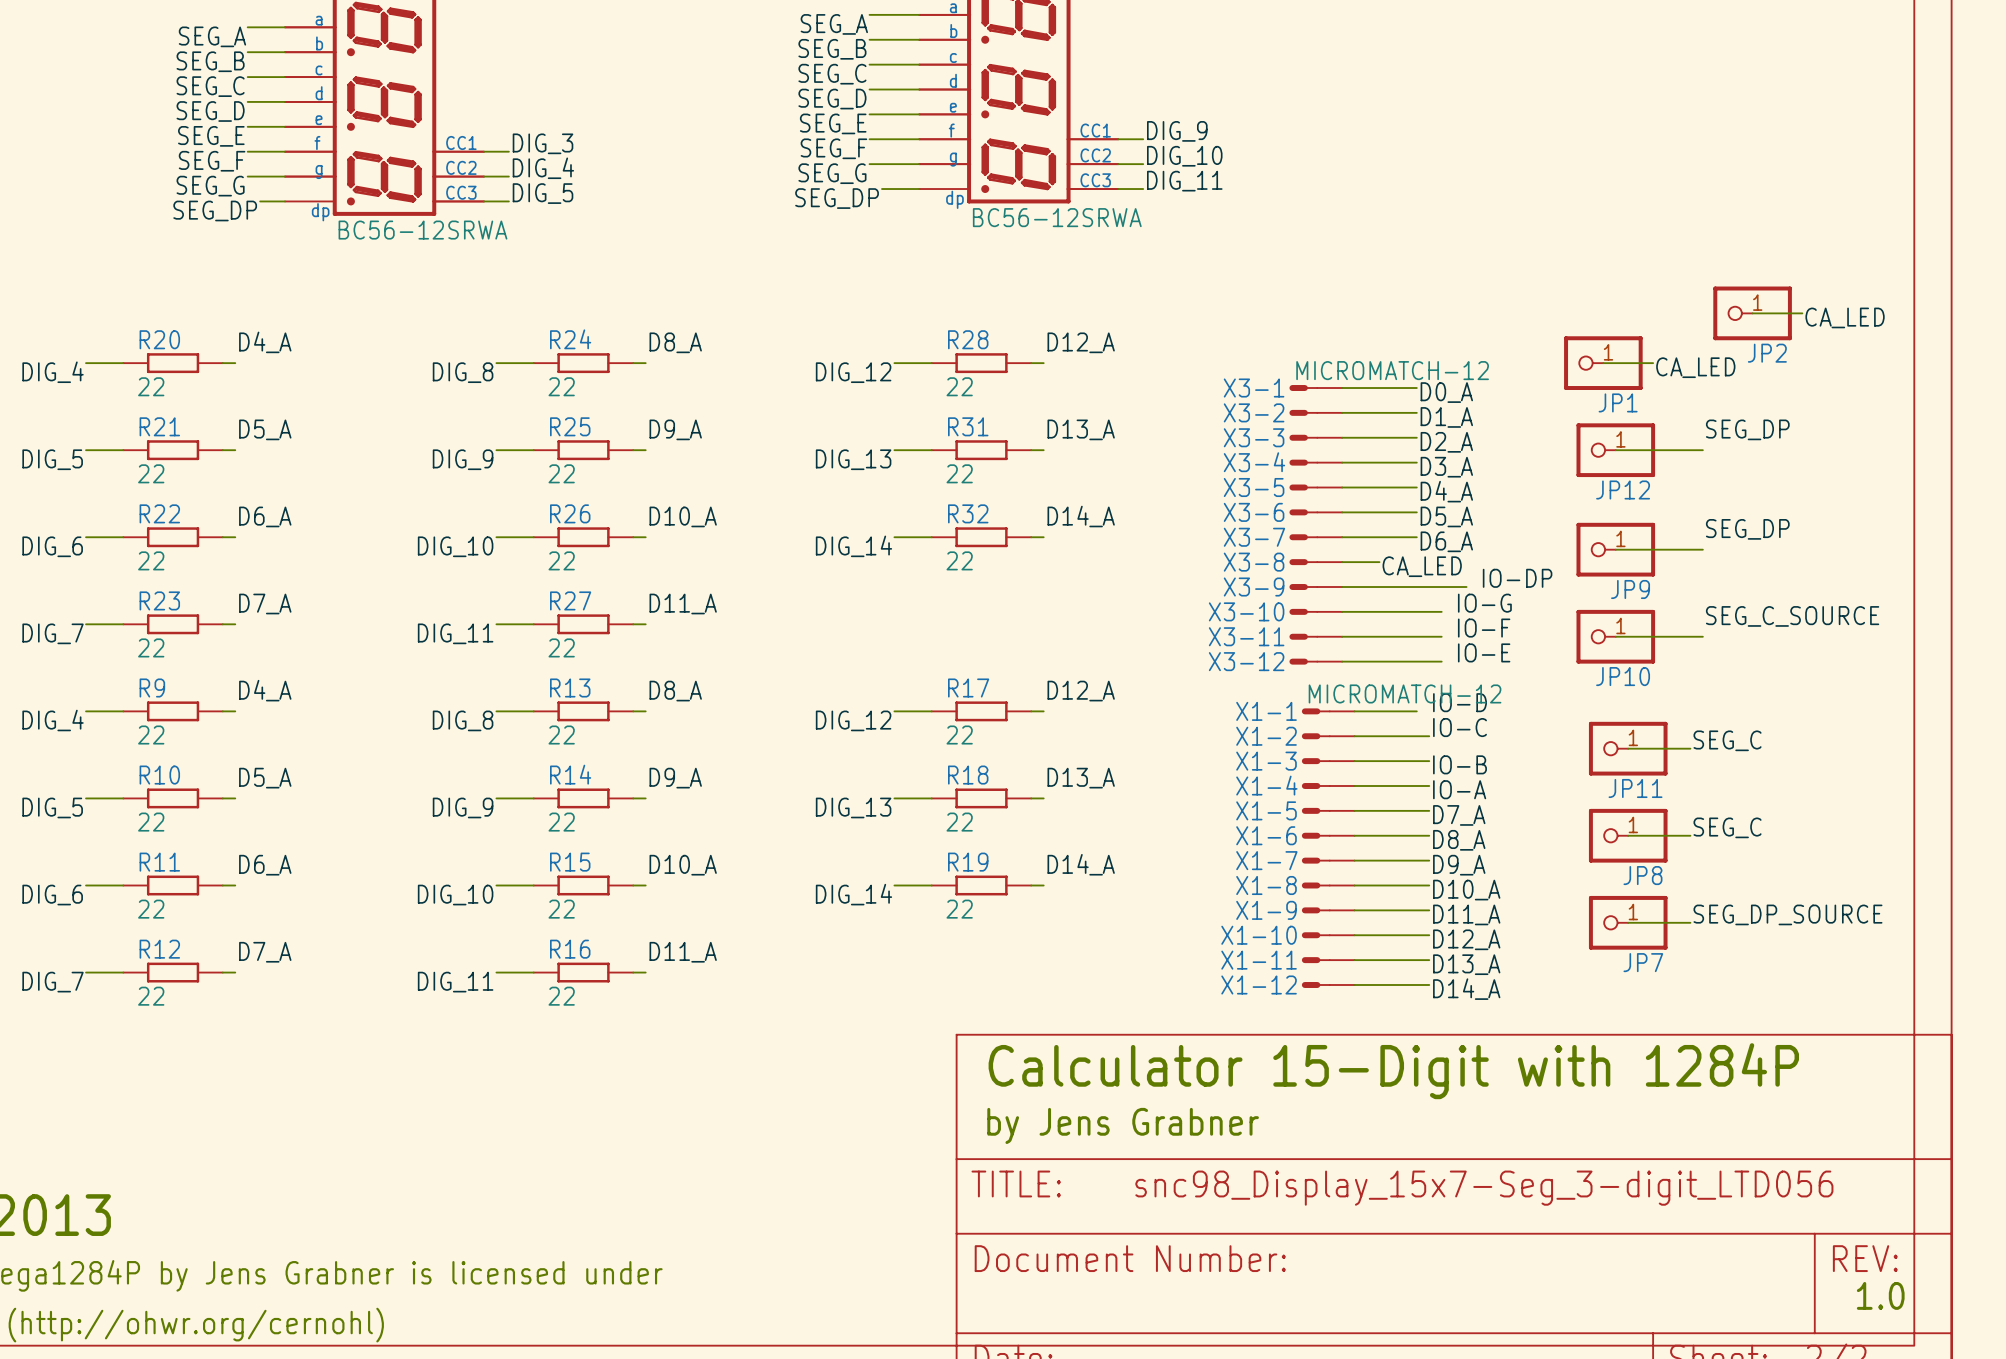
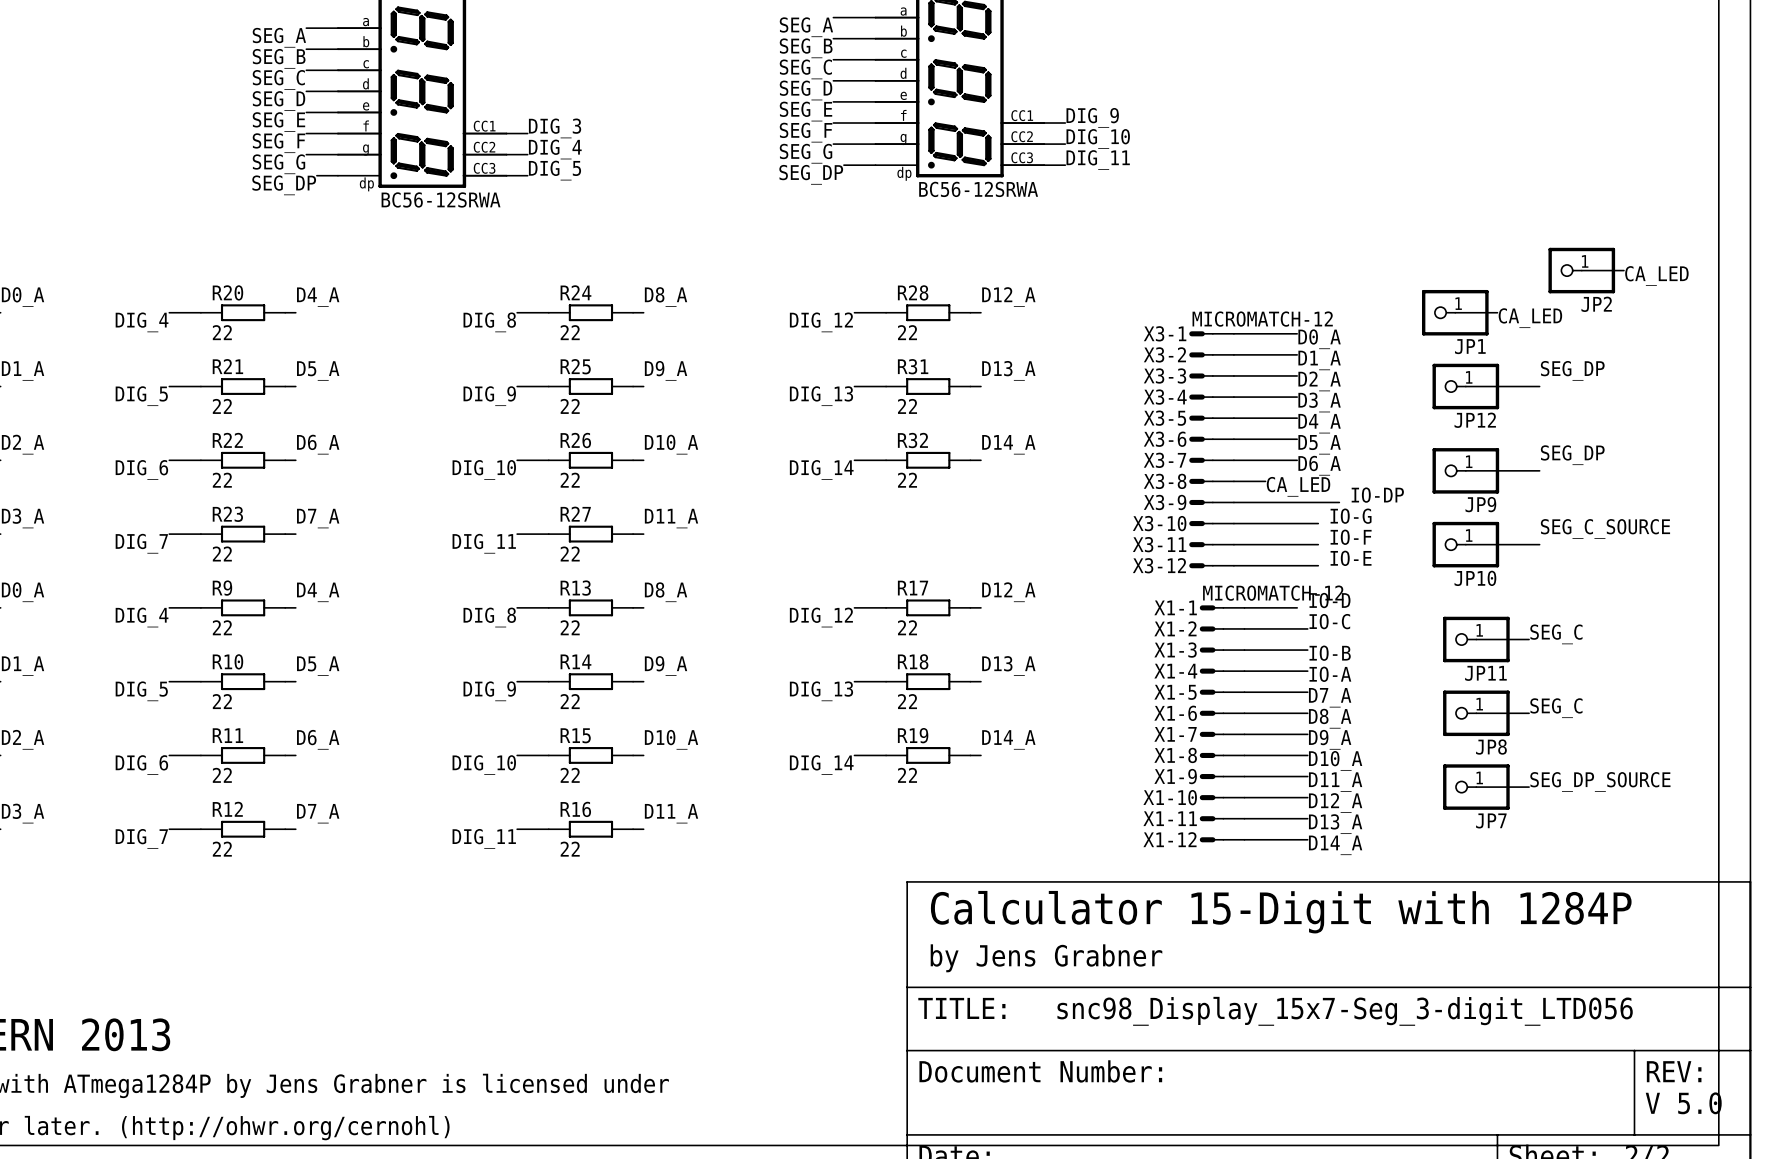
text: none -> V 5.0 (1683, 1103)
text: 1.0 (1880, 1295) -> none

